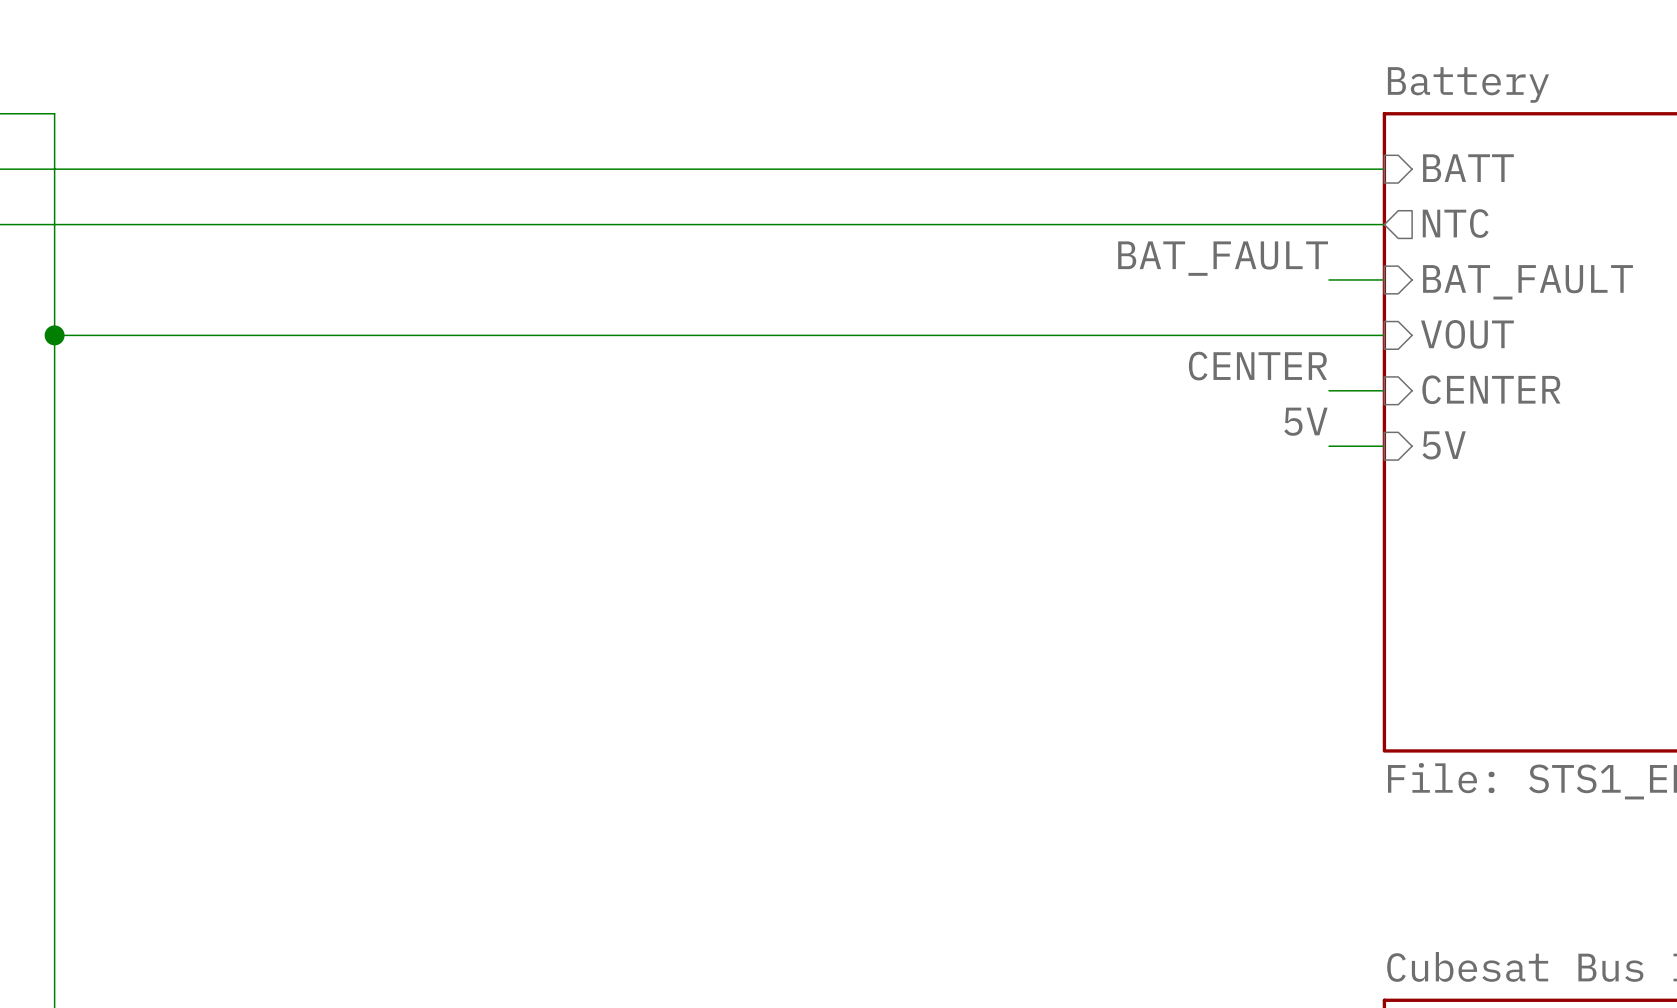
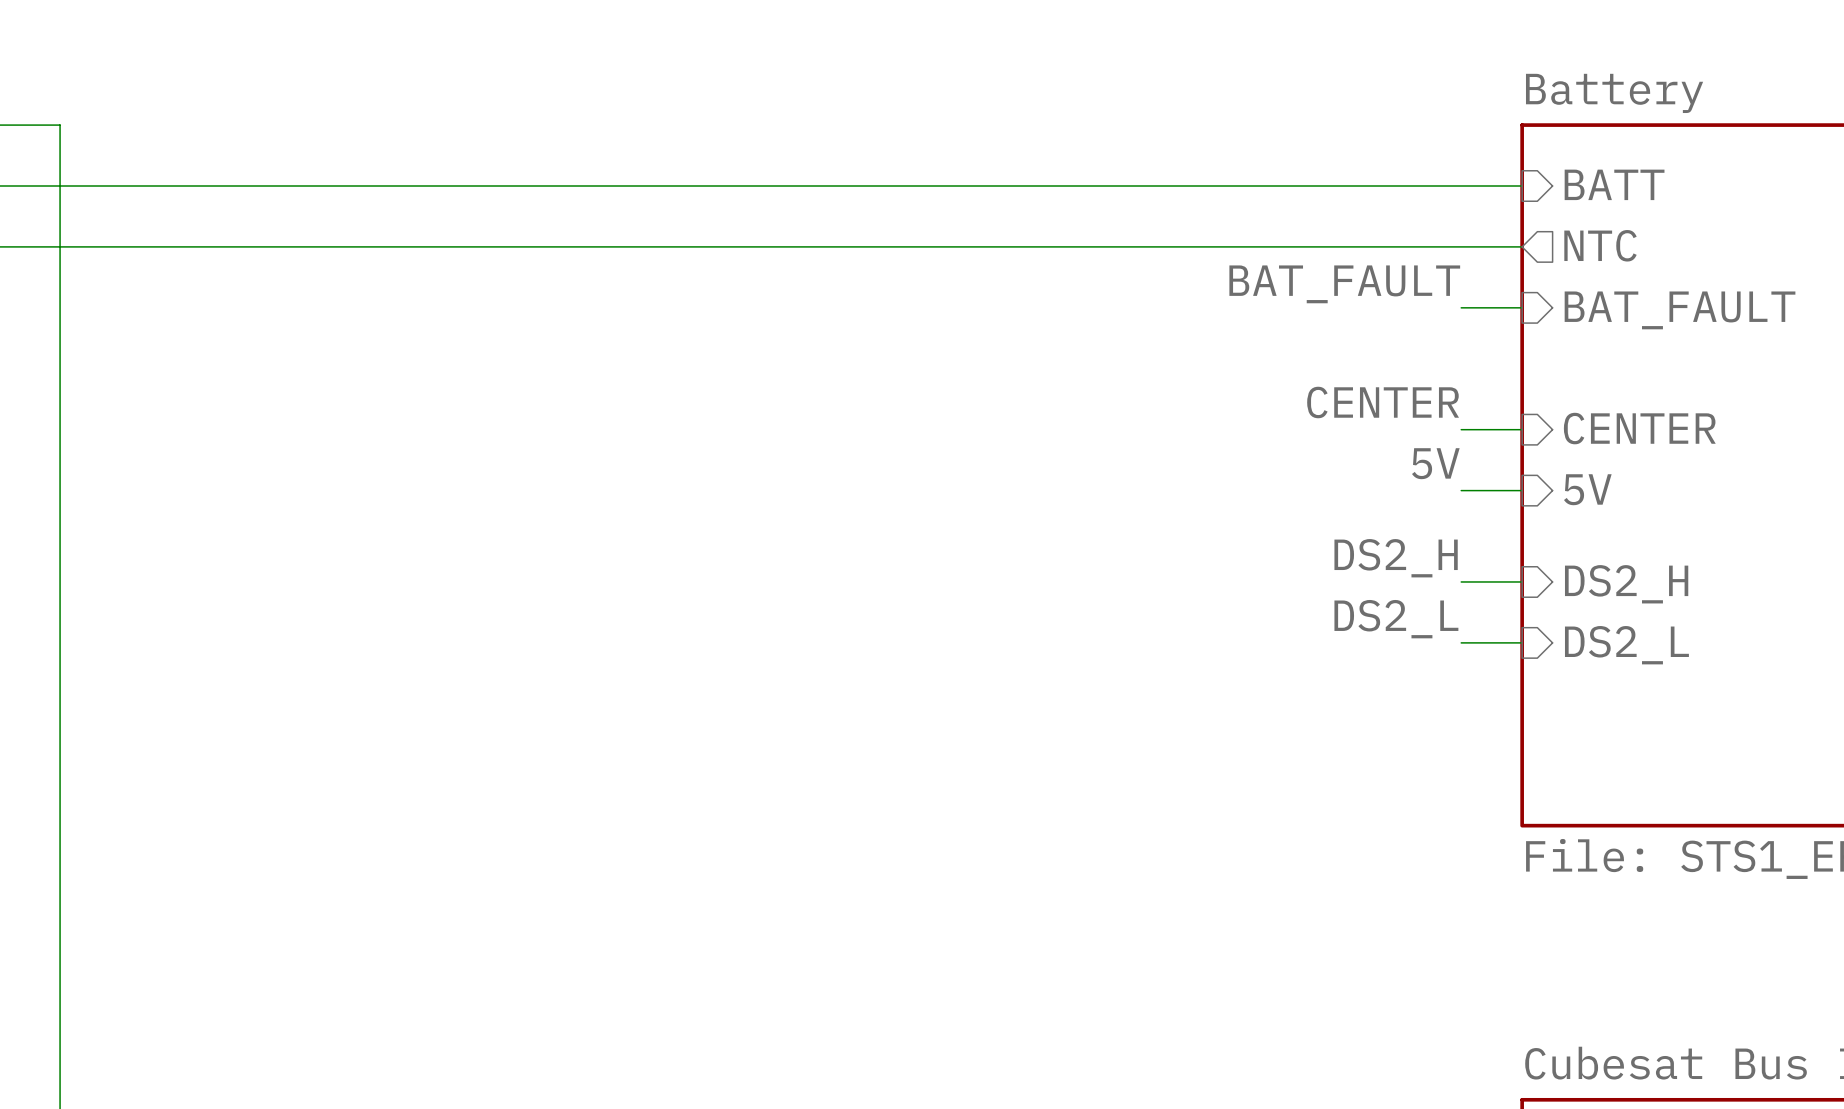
sheet pin: VOUT (1467, 334) -> none
wire: (54, 335) (1384, 335) -> none
junction: (54, 335) -> none
label: none -> DS2_H (1396, 558)
wire: none -> (1461, 581) (1522, 581)
sheet pin: none -> DS2_H (1626, 584)
label: none -> DS2_L (1396, 619)
wire: none -> (1461, 642) (1522, 642)
sheet pin: none -> DS2_L (1626, 645)

